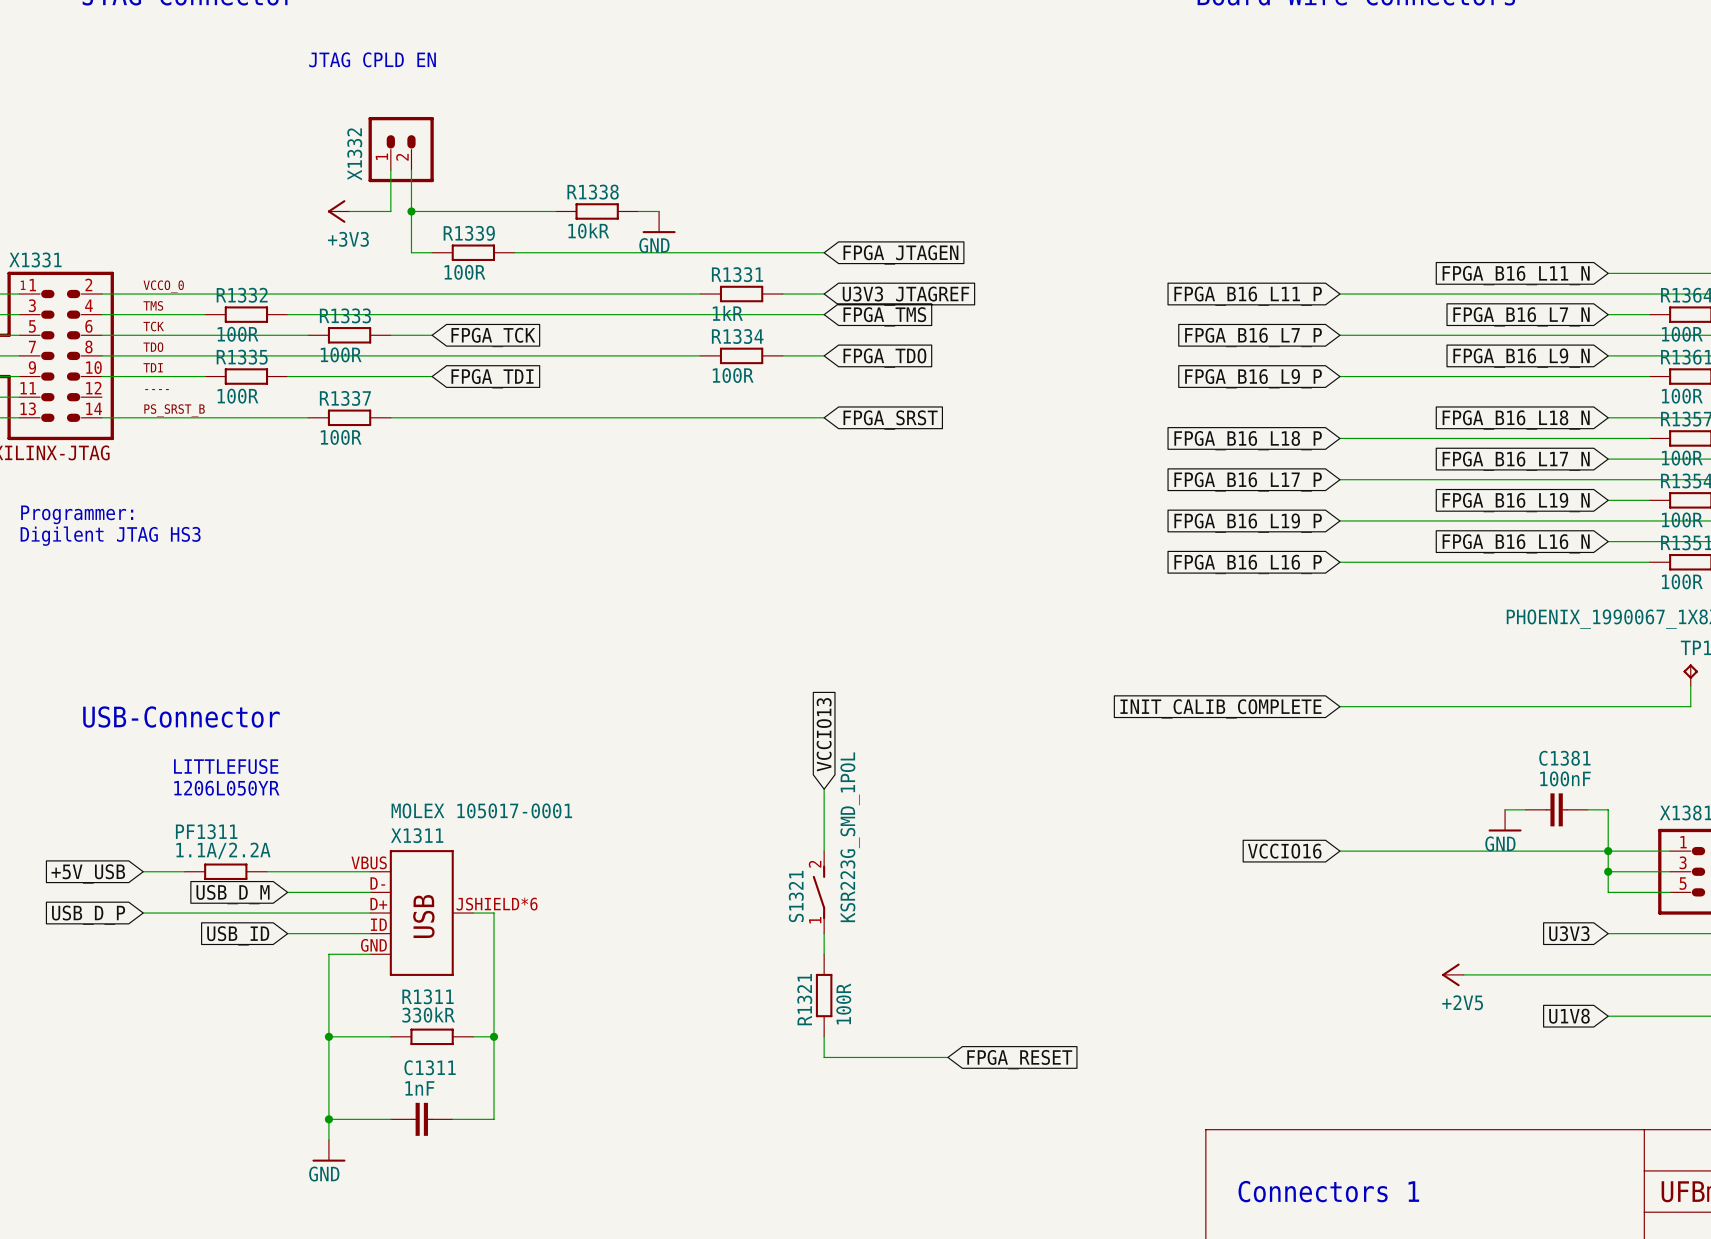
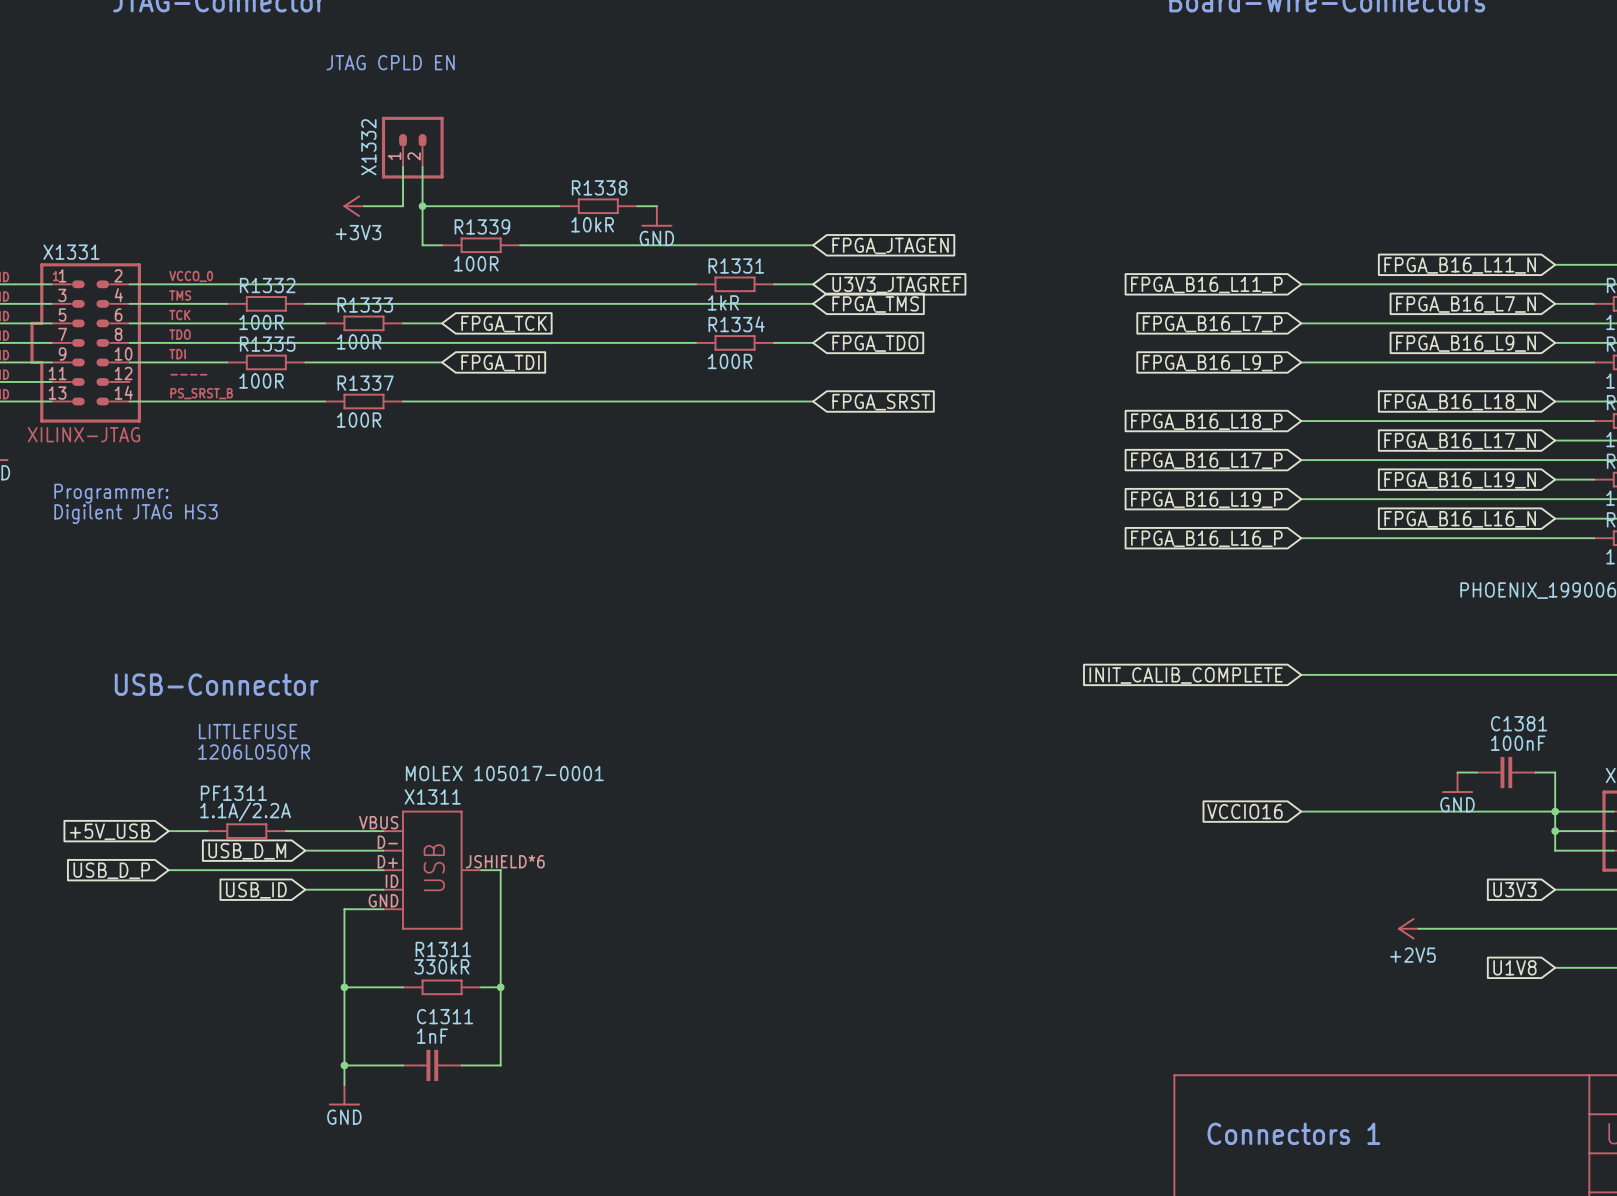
global label: VCCIO13 (824, 734) -> none
wire: (824, 789) (824, 851) -> none
S1321: KSR223G_SMD_1POL (818, 892) -> none
wire: (824, 933) (824, 954) -> none
R1321: 100R (824, 995) -> none
wire: (824, 1036) (824, 1057) (947, 1057) -> none
global label: FPGA_RESET (1019, 1059) -> none

